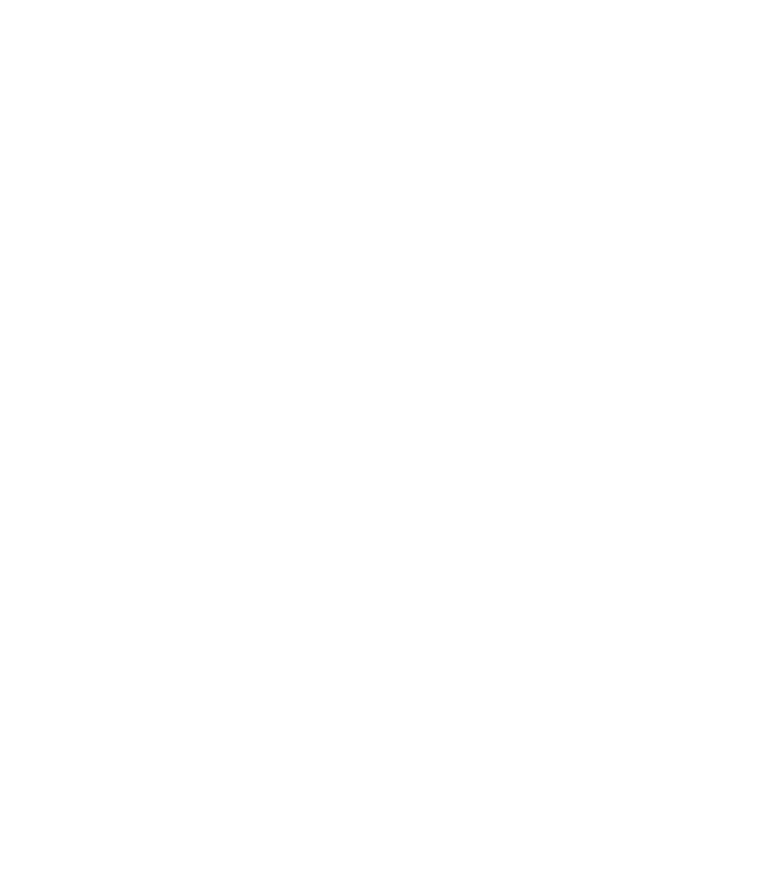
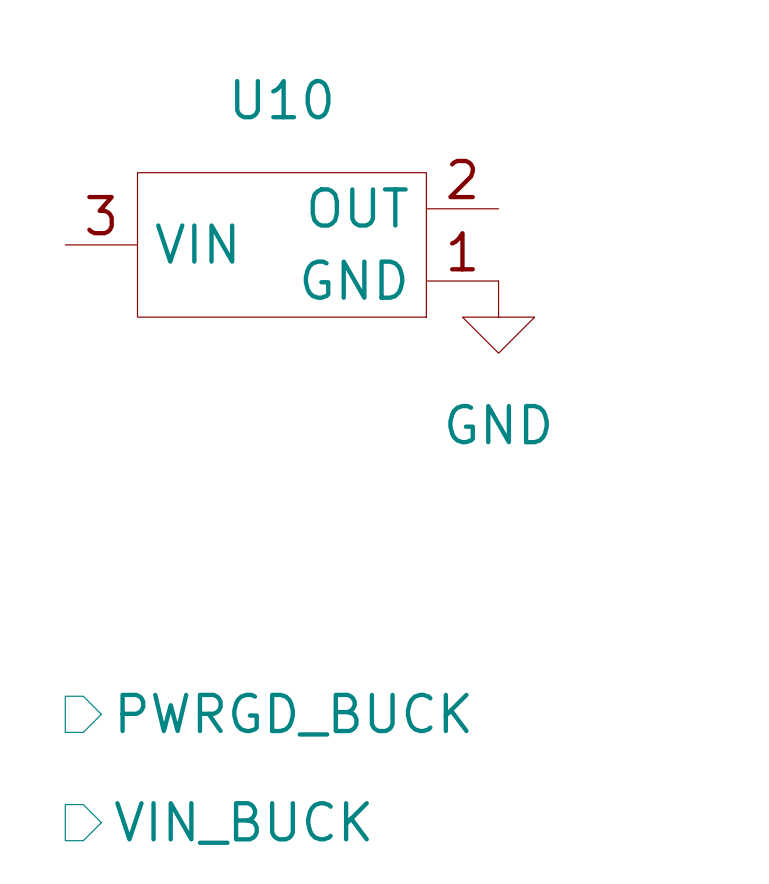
U10: none -> (281, 244)
power symbol: none -> GND (498, 317)
sheet pin: none -> PWRGD_BUCK (294, 714)
sheet pin: none -> VIN_BUCK (242, 822)

